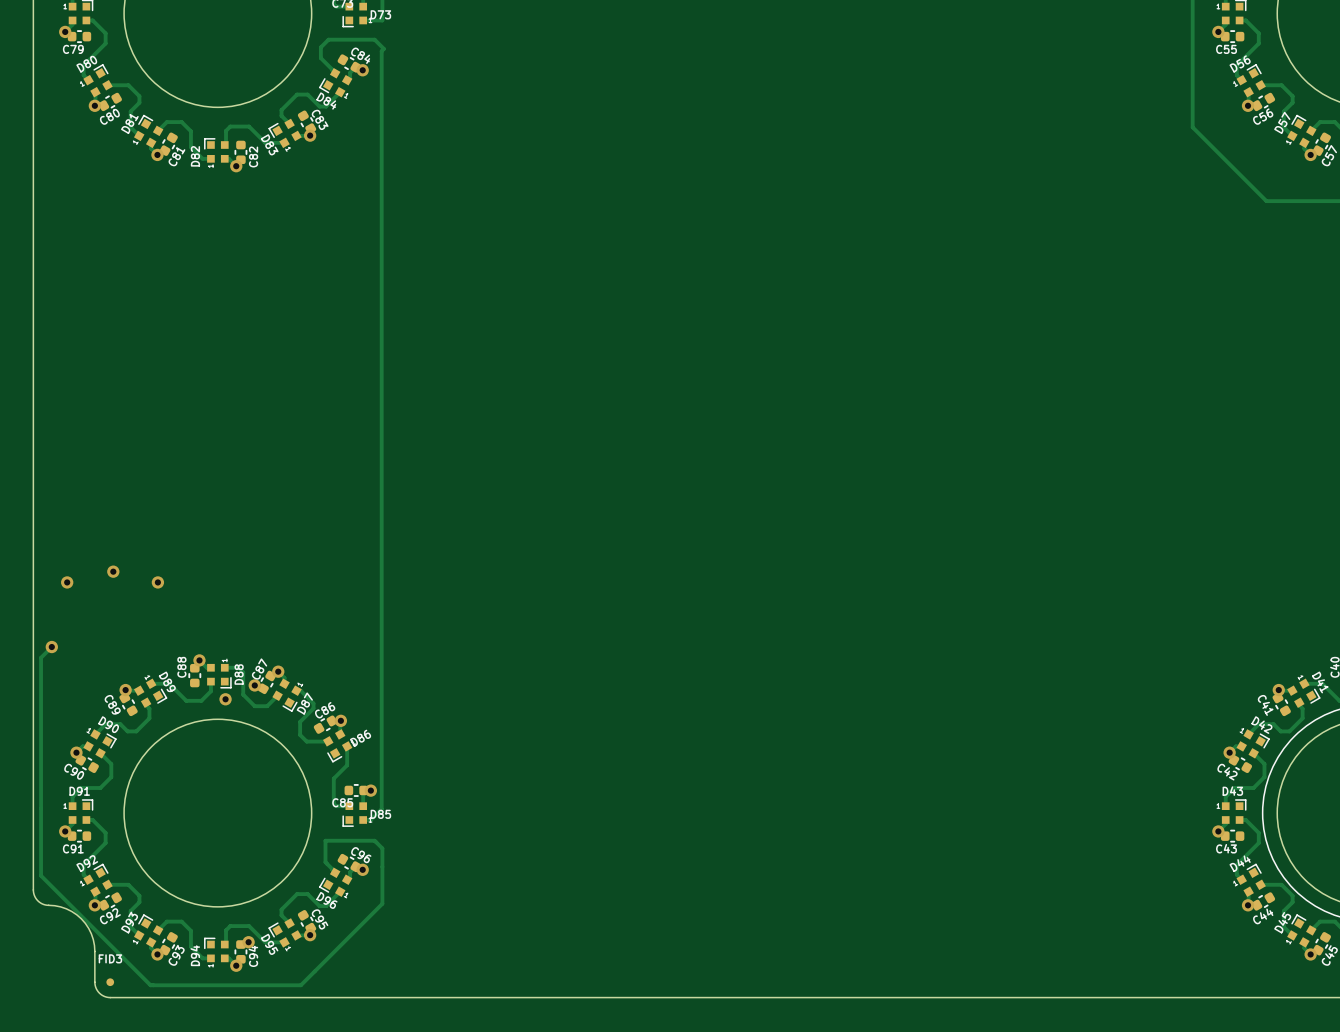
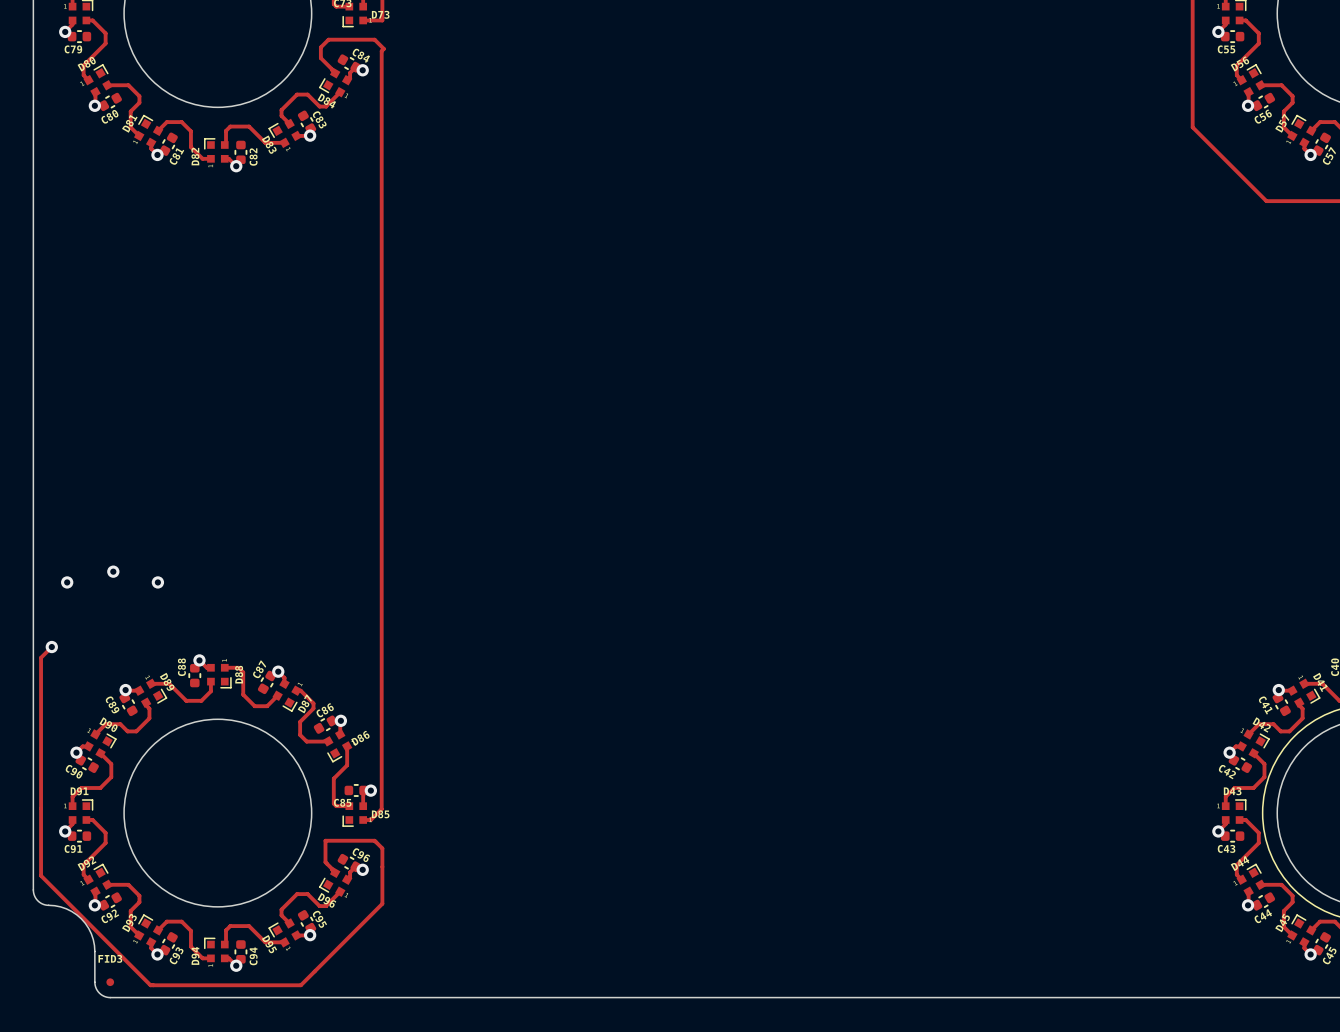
via: (254, 685) -> none
via: (225, 699) -> none
via: (248, 942) -> none

